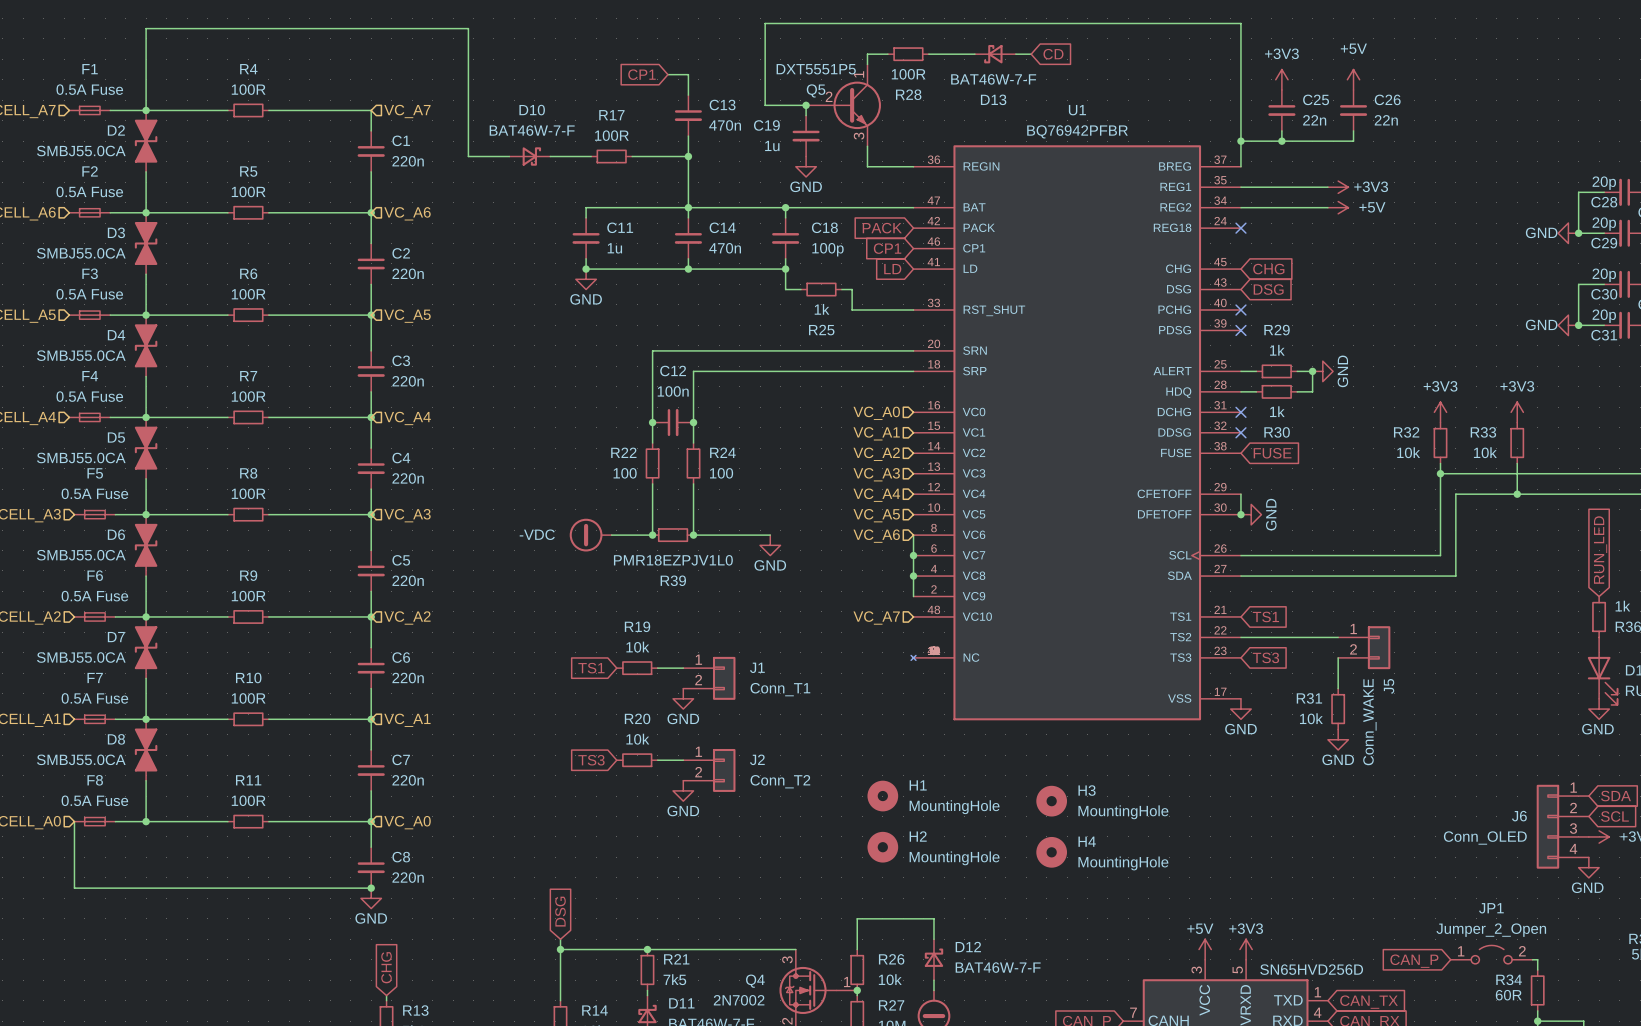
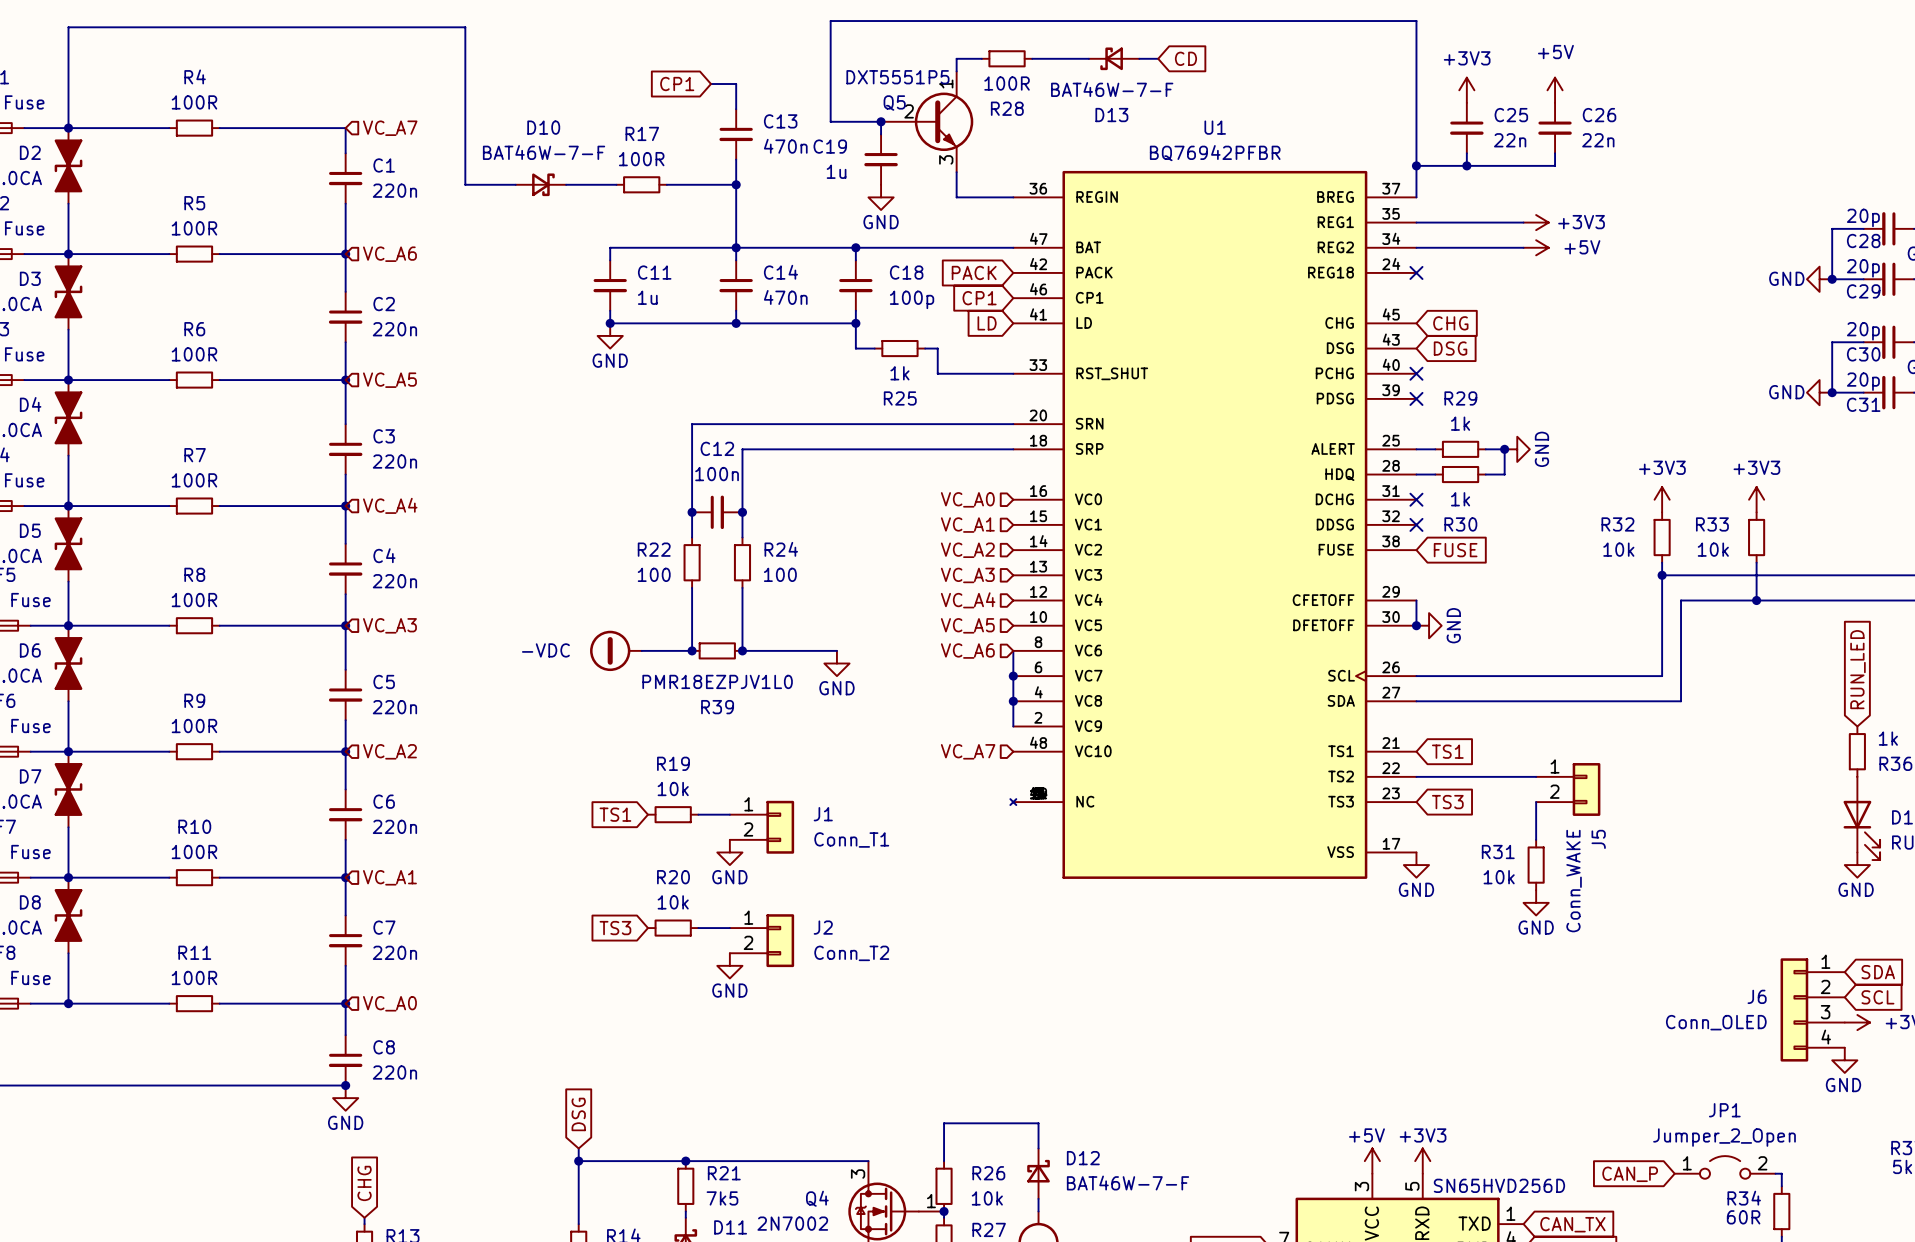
H1: MountingHole (882, 796) -> none
H3: MountingHole (1051, 801) -> none
H2: MountingHole (882, 847) -> none
H4: MountingHole (1051, 852) -> none

